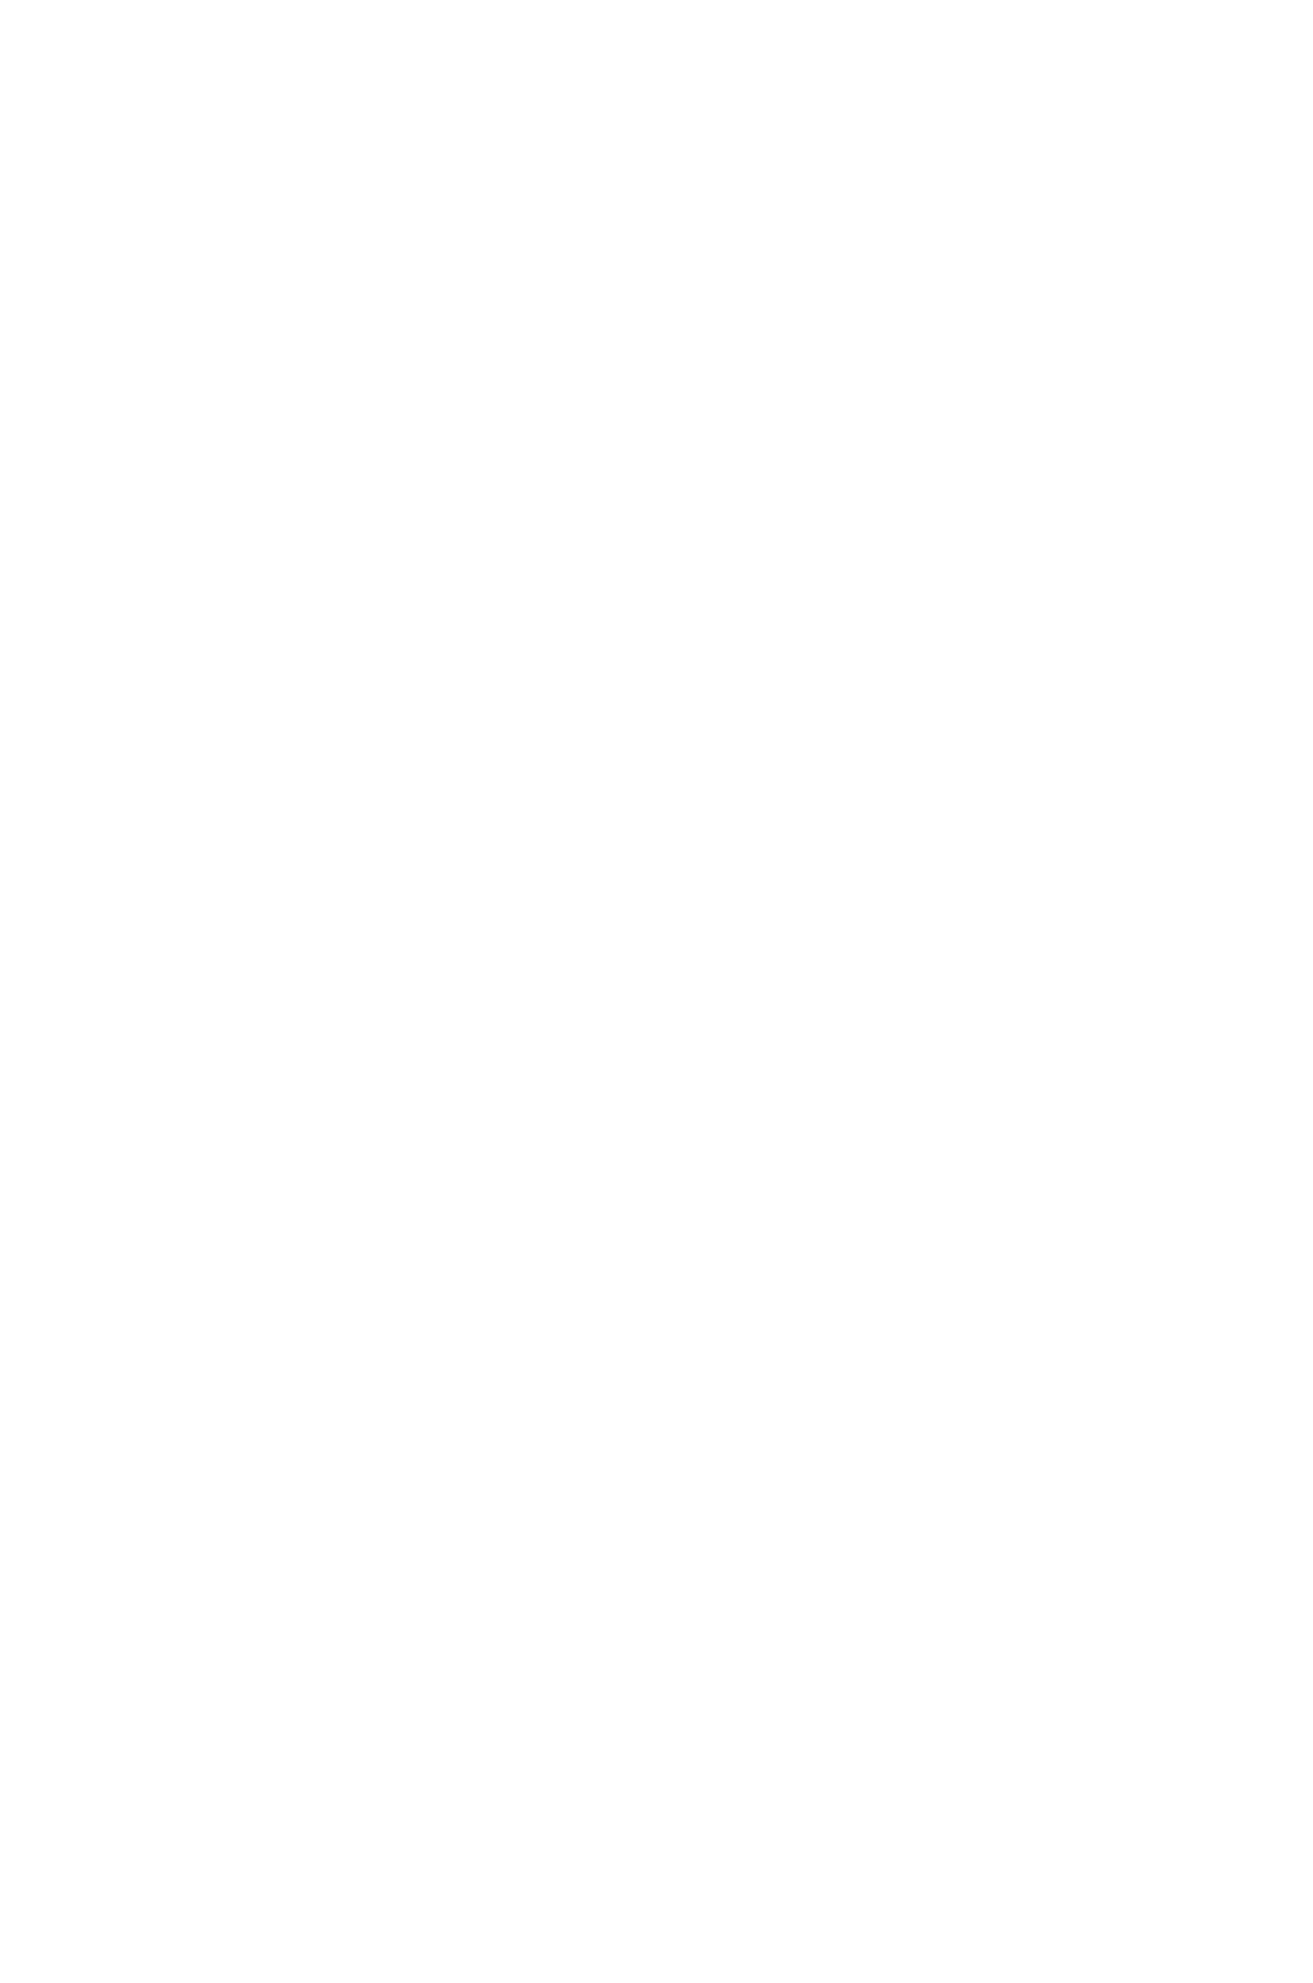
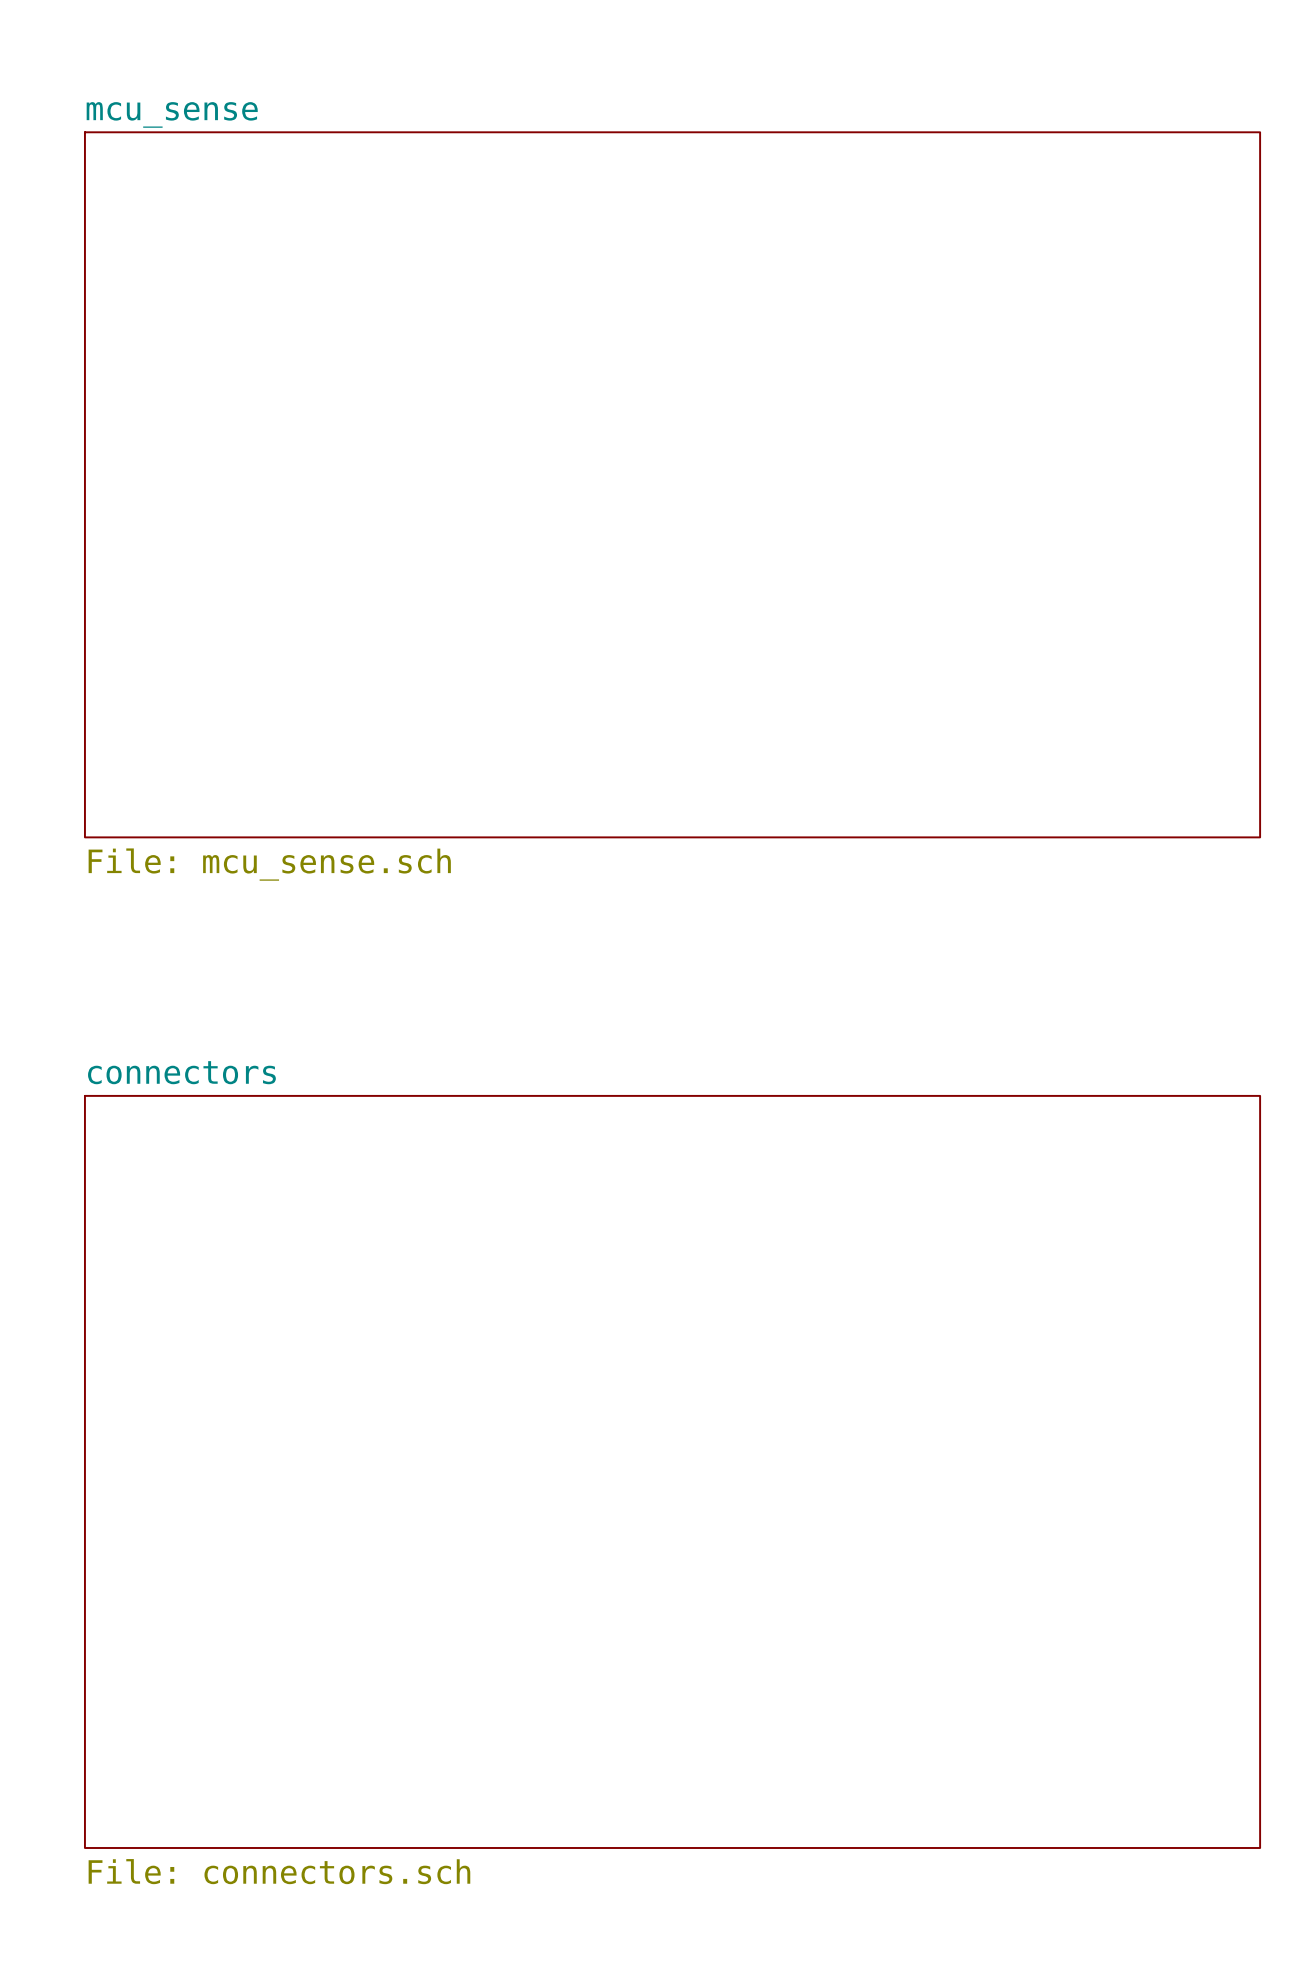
sheet mcu_sense: none -> File: mcu_sense.sch (672, 484)
sheet connectors: none -> File: connectors.sch (672, 1471)

